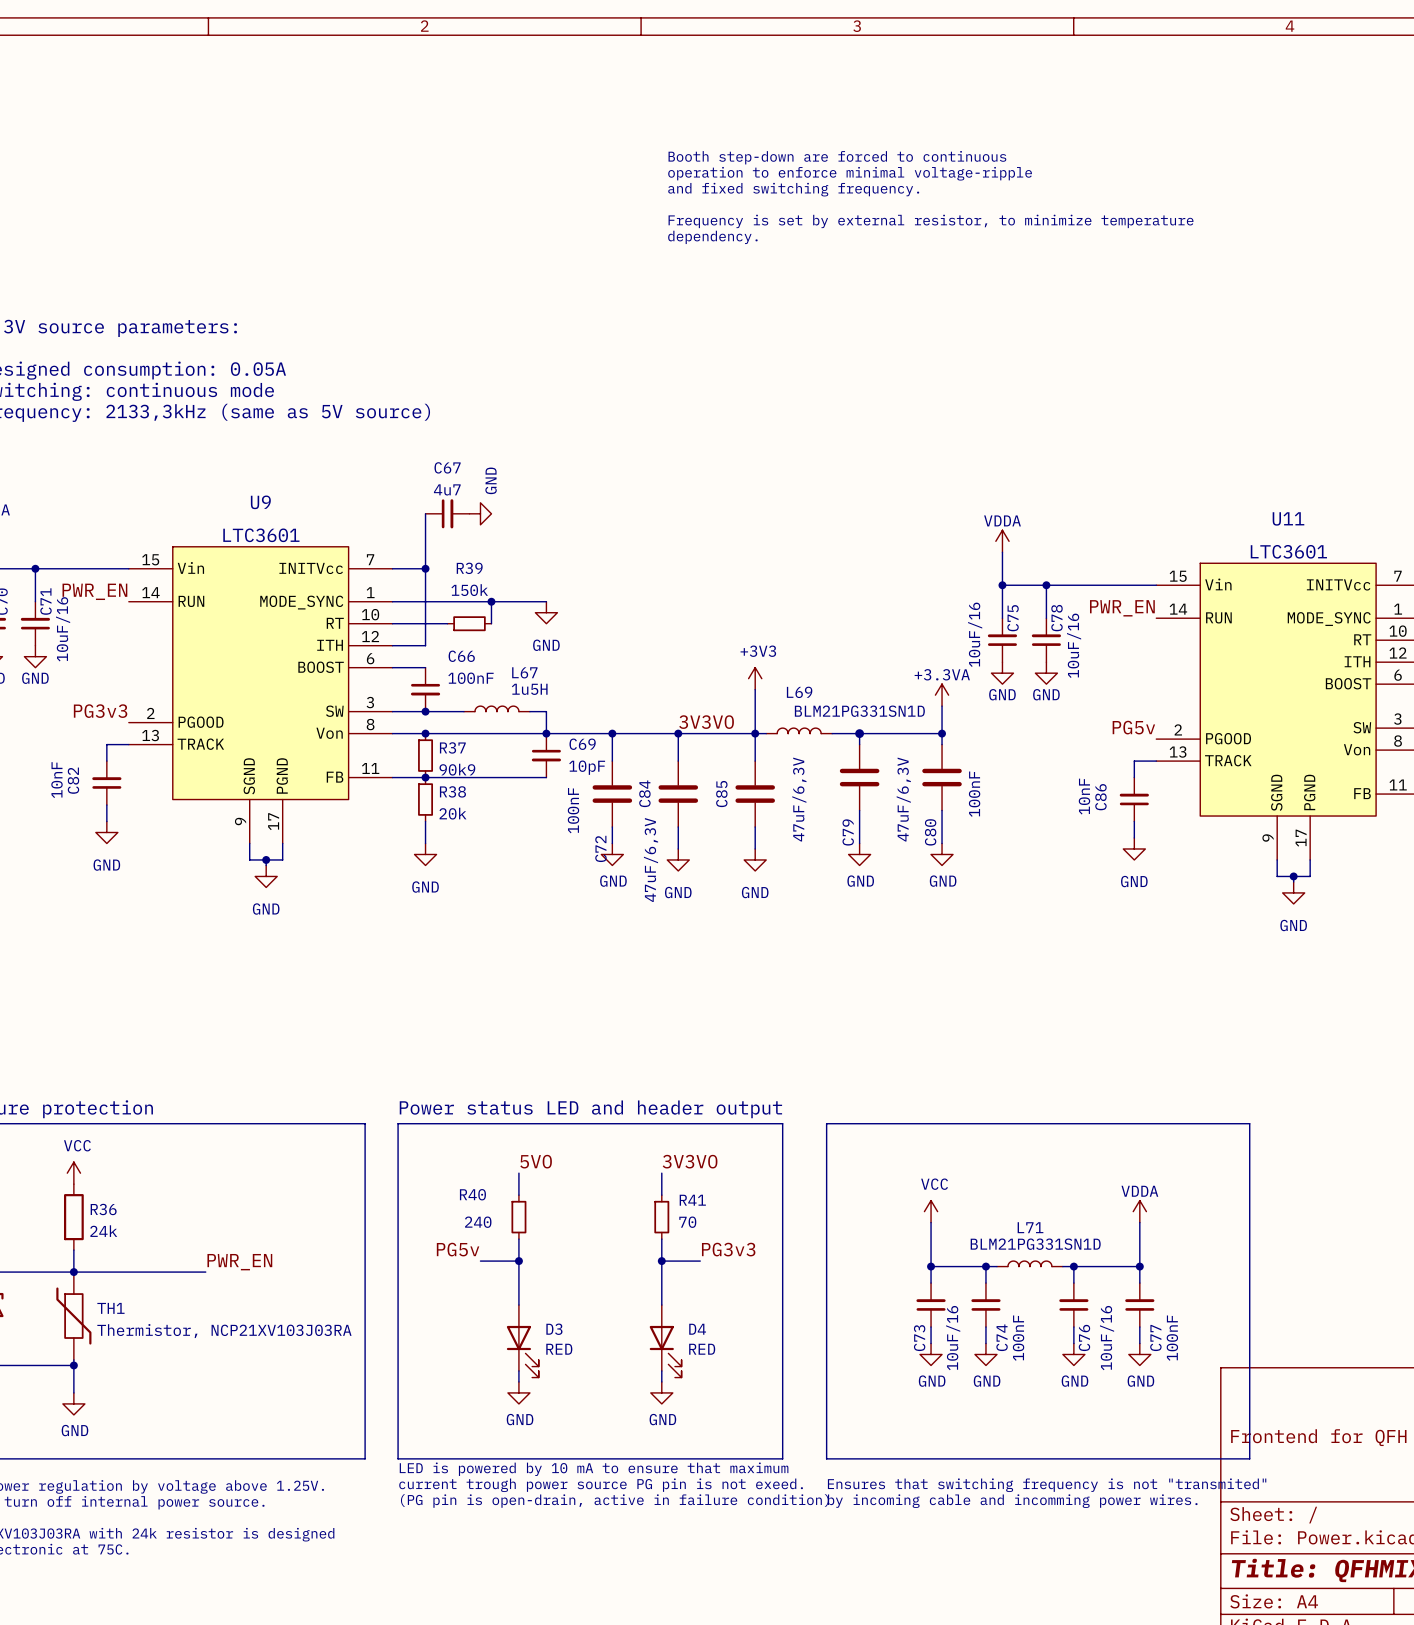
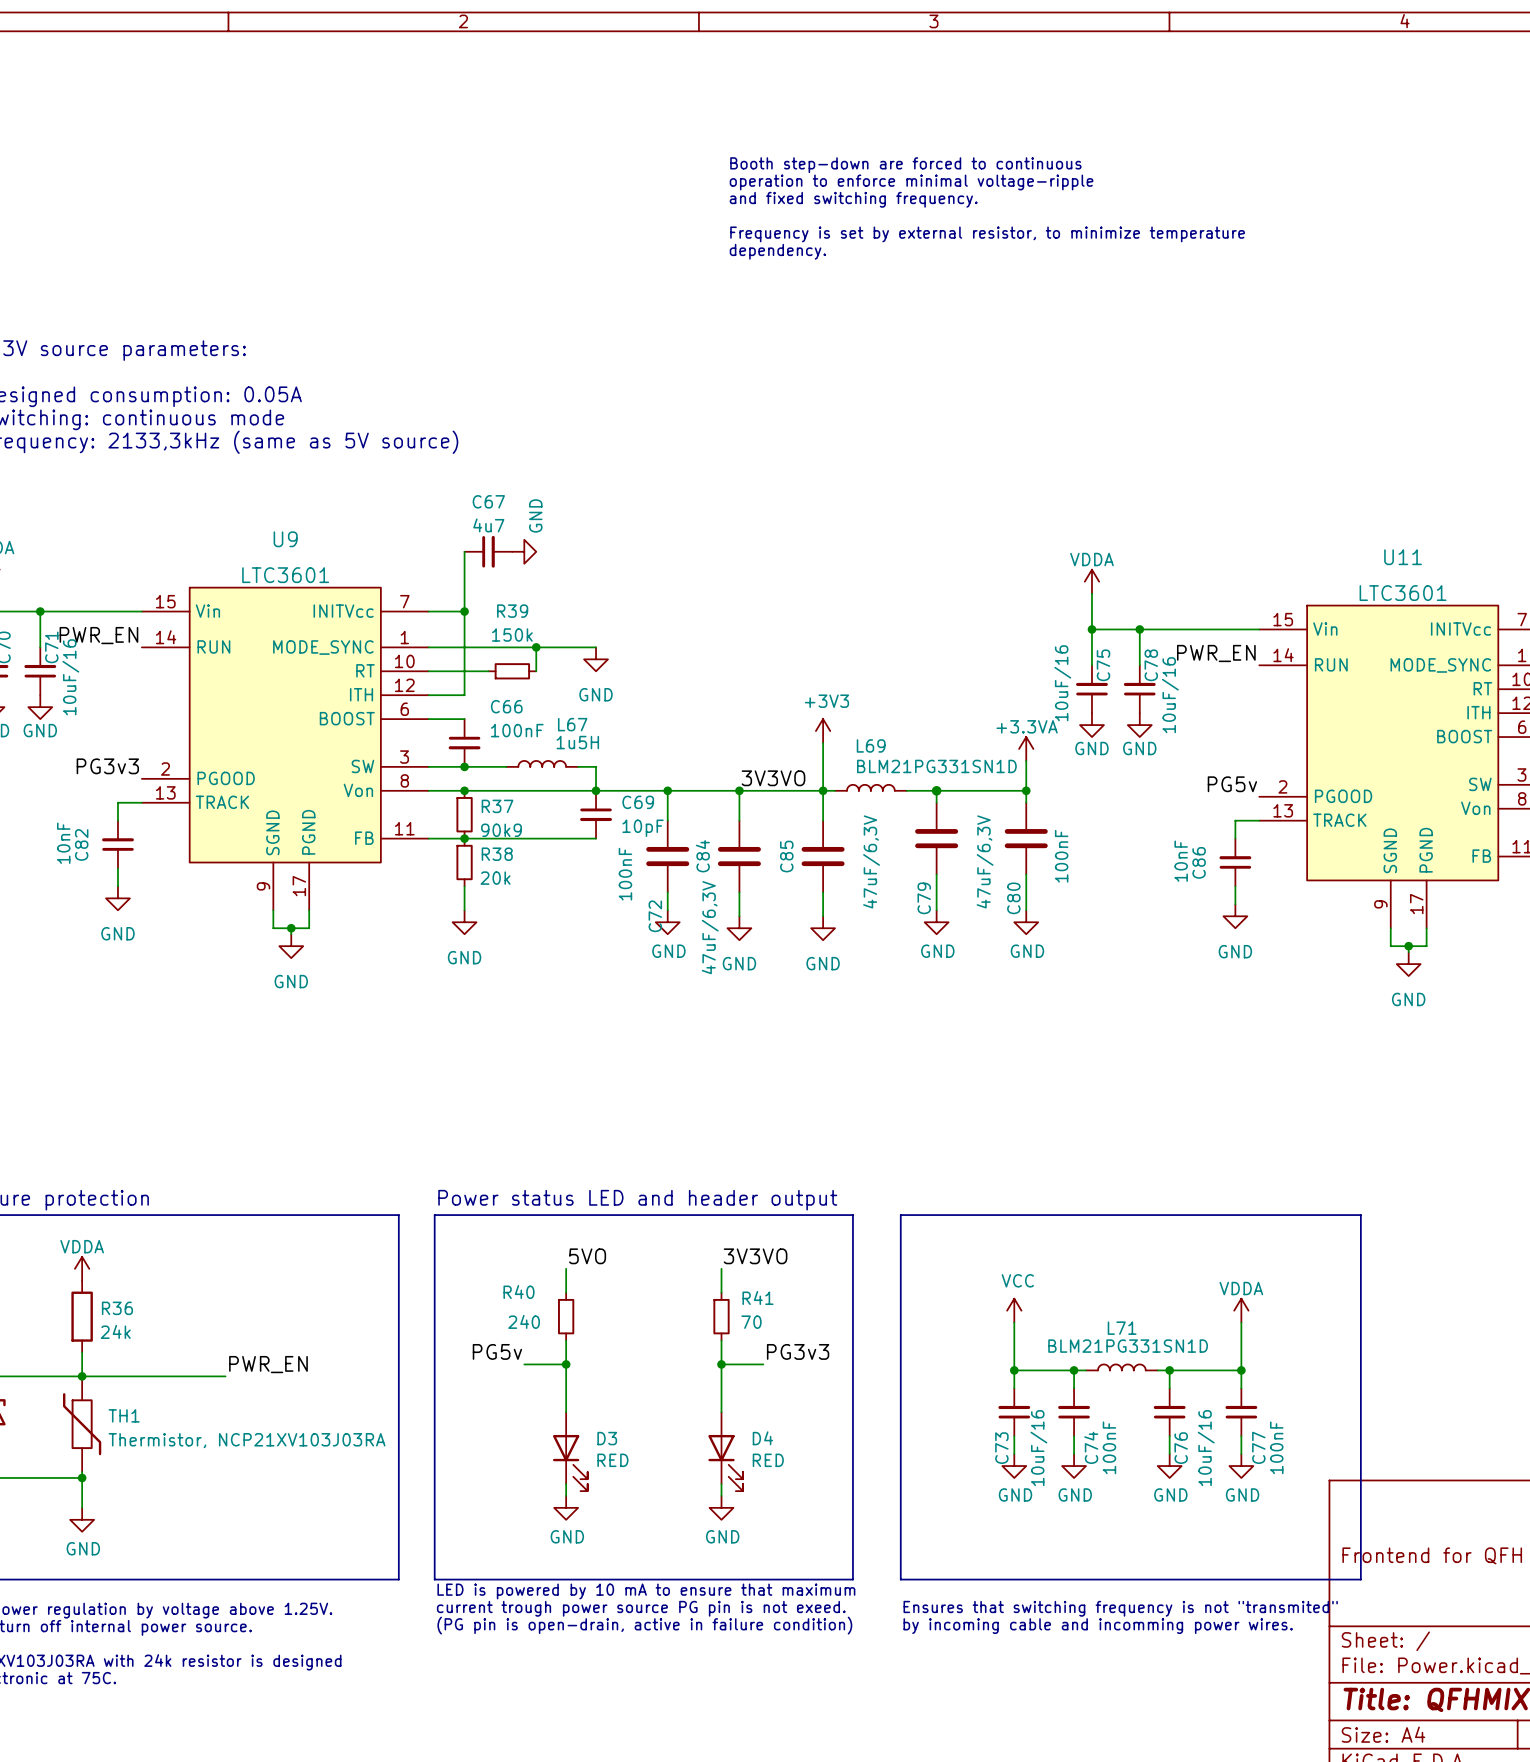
power symbol: VCC (73, 1173) -> VDDA (82, 1268)

